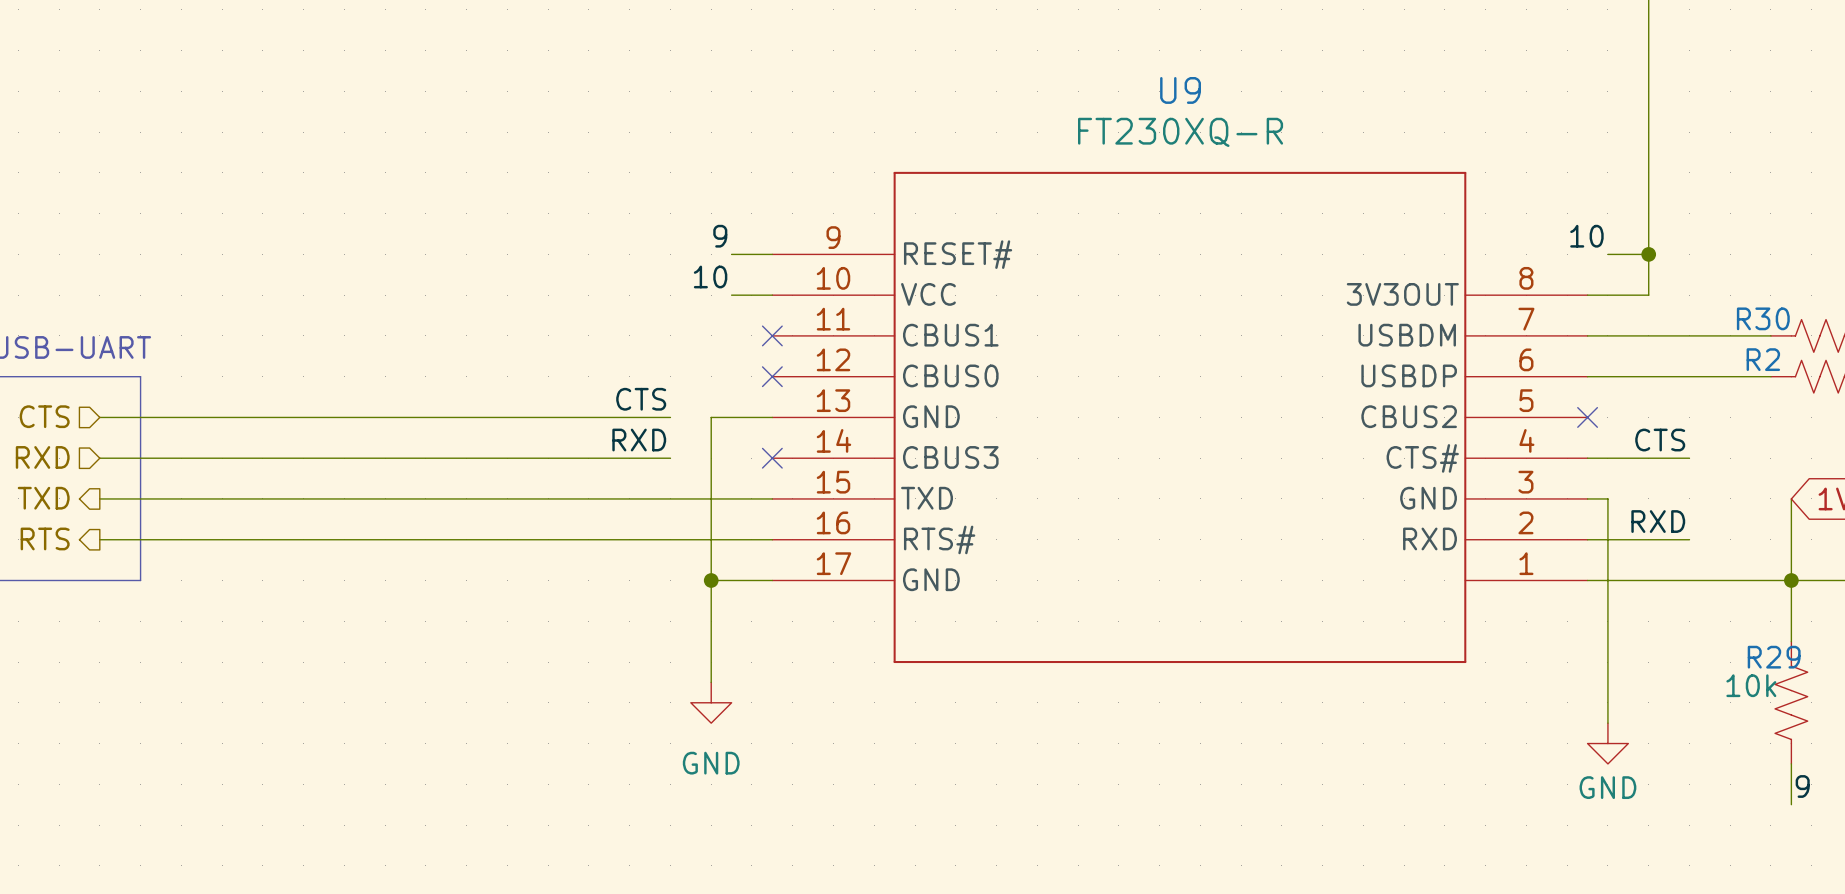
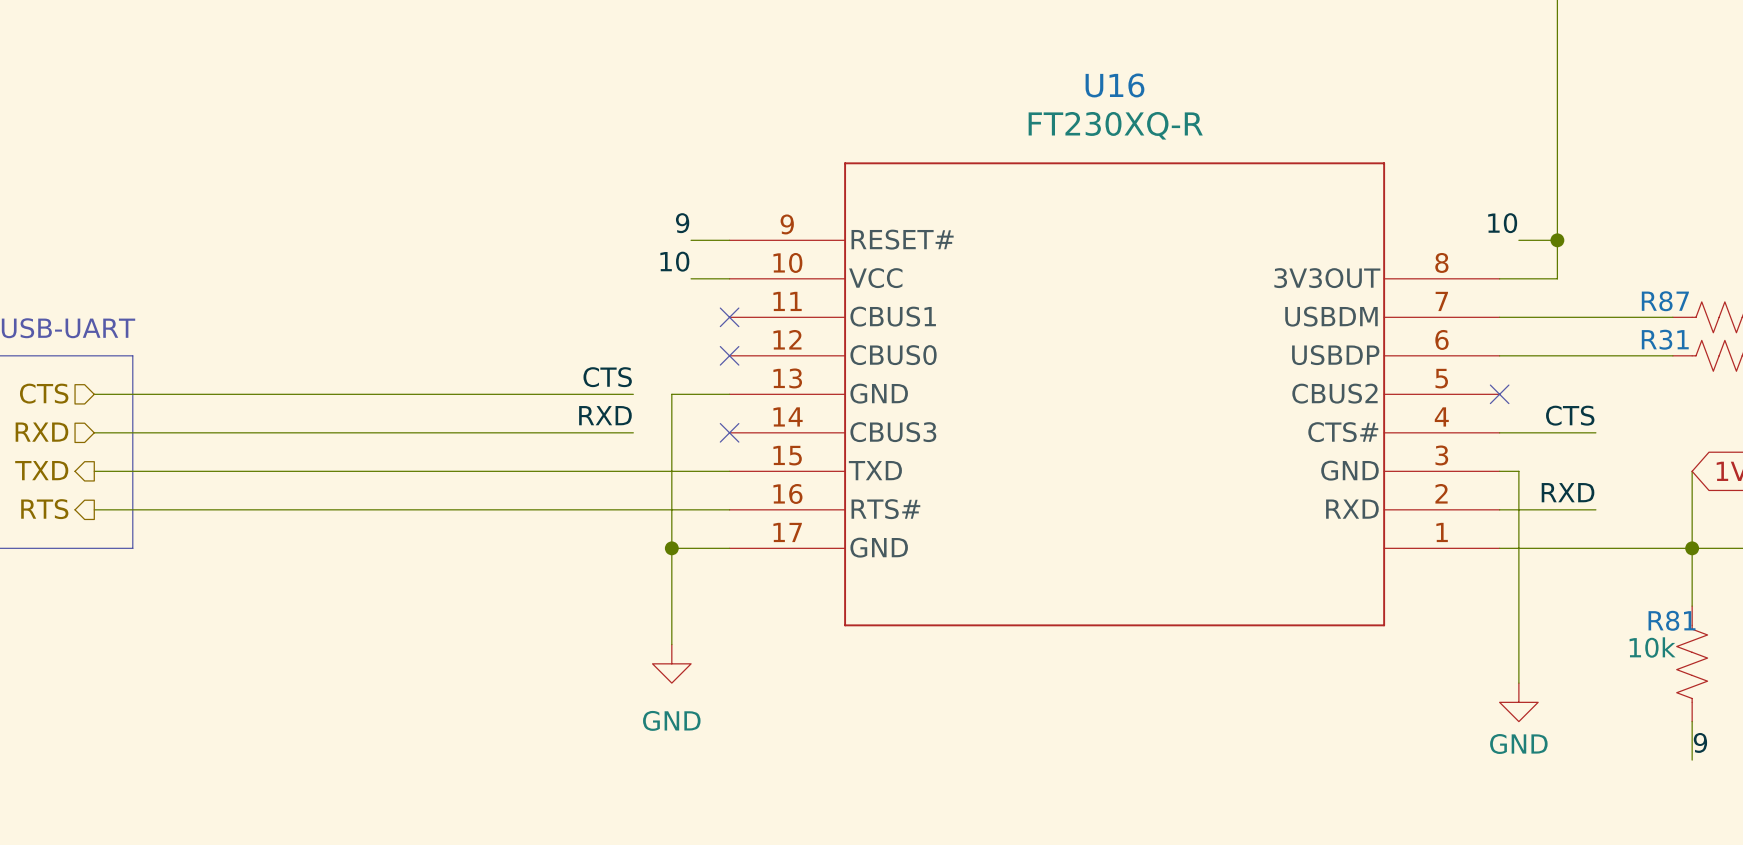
U9 name: U9 (1180, 90) -> U16 (1114, 85)
R30 name: R30 (1763, 318) -> R87 (1665, 301)
R2 name: R2 (1763, 359) -> R31 (1665, 339)
R29 name: R29 (1774, 657) -> R81 (1672, 620)

